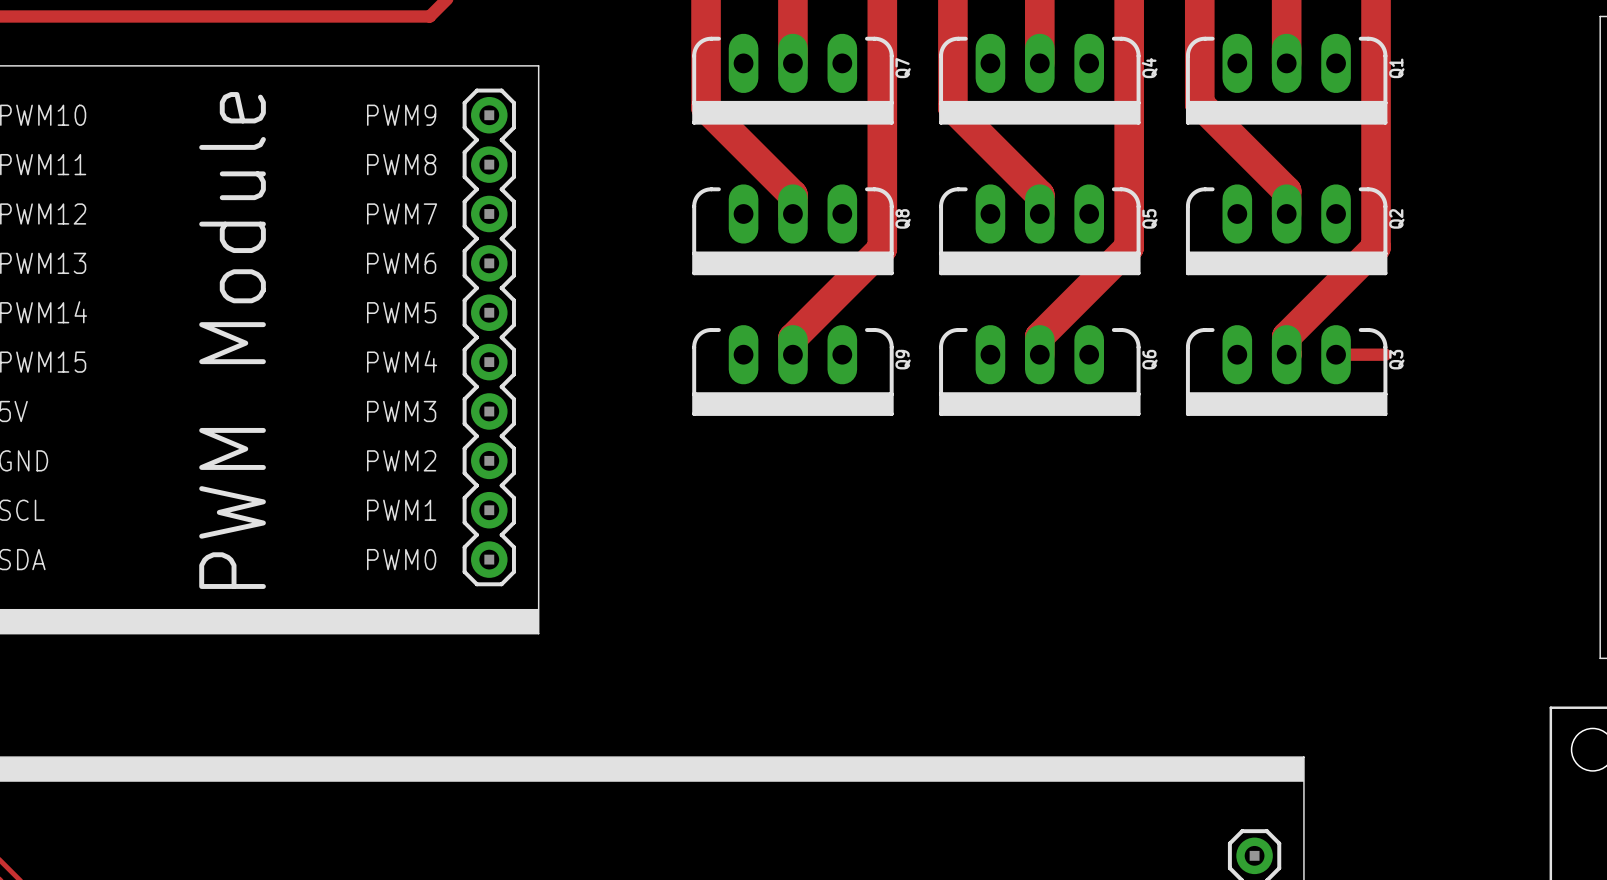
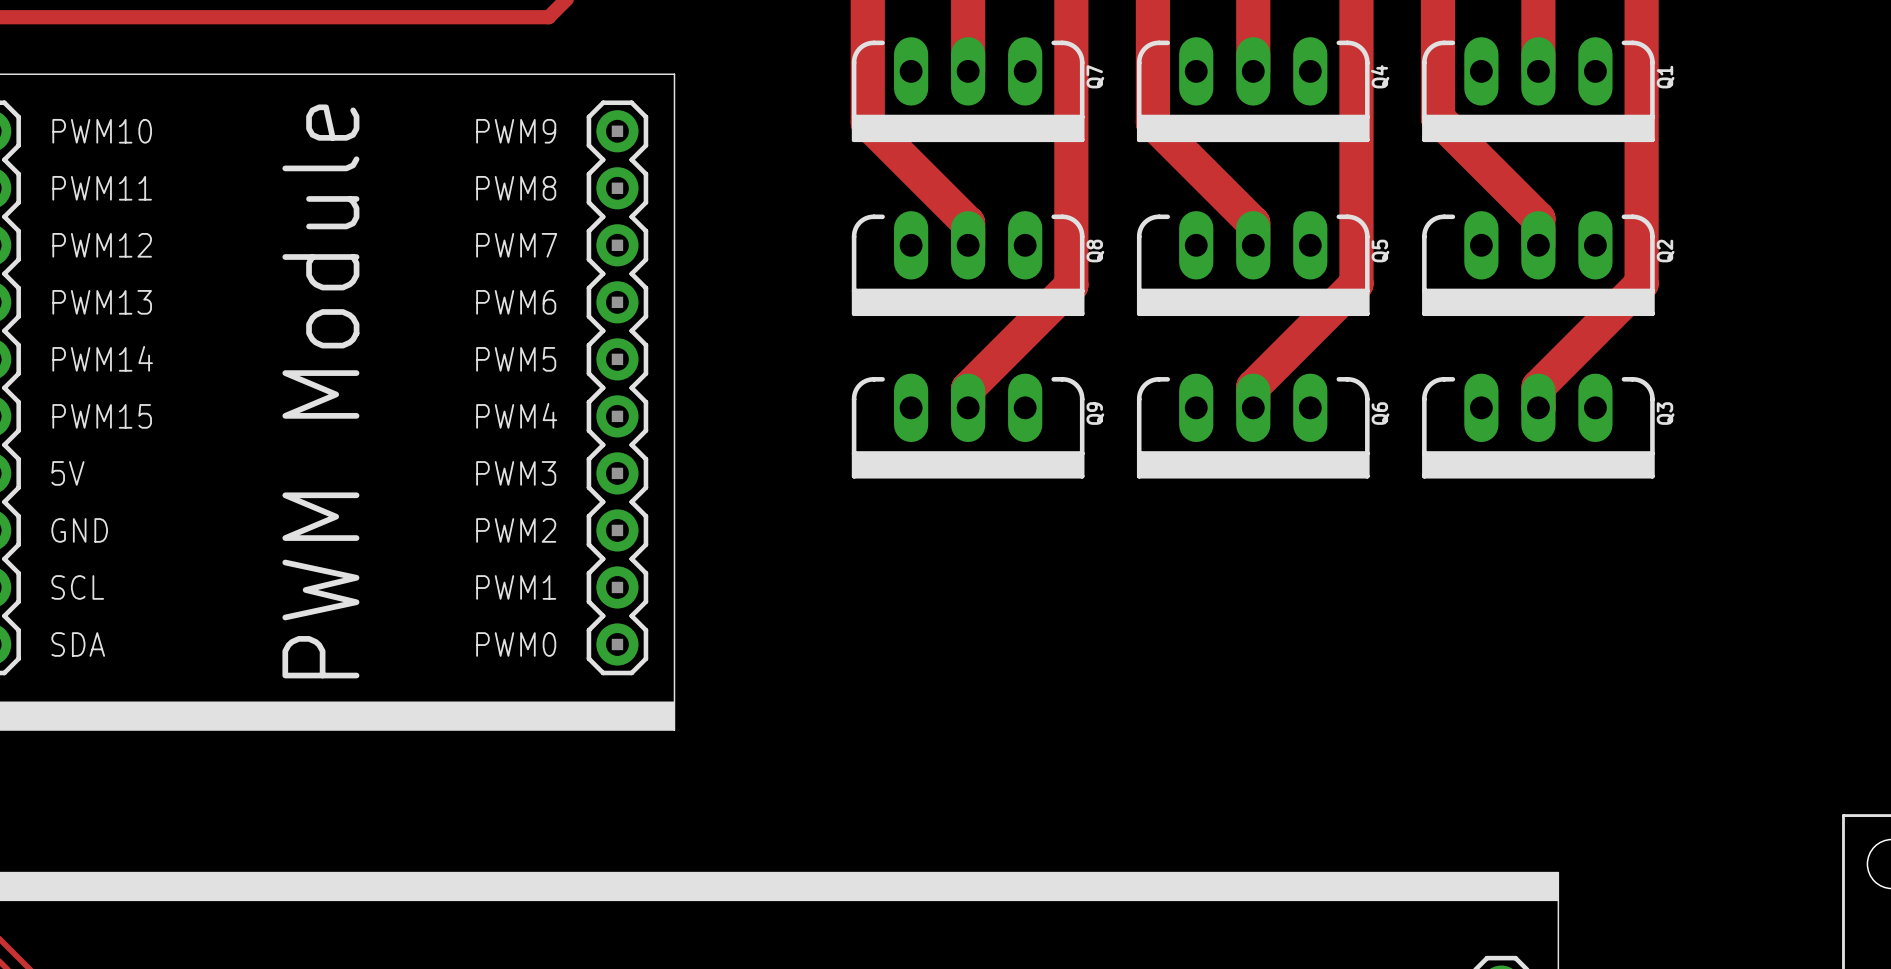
track: (1336, 354) (1385, 354) -> none

